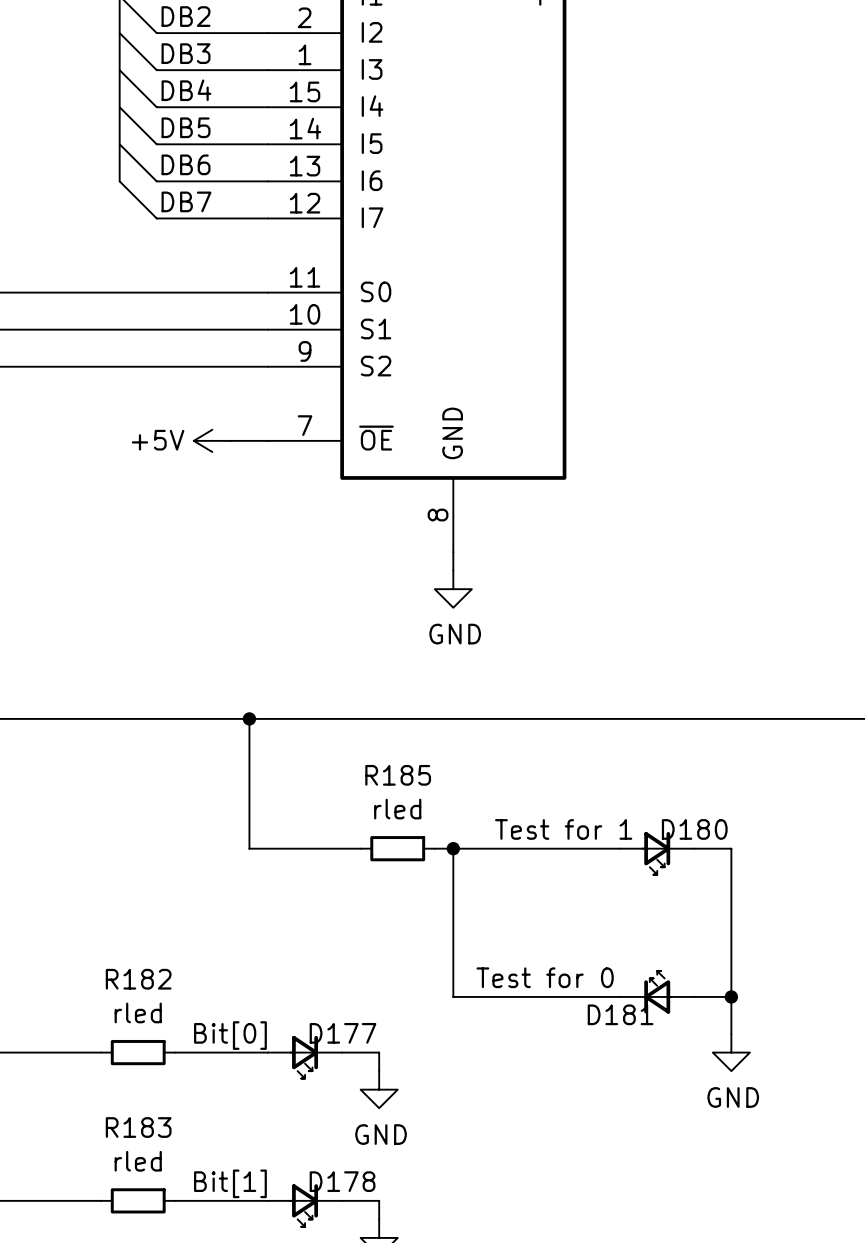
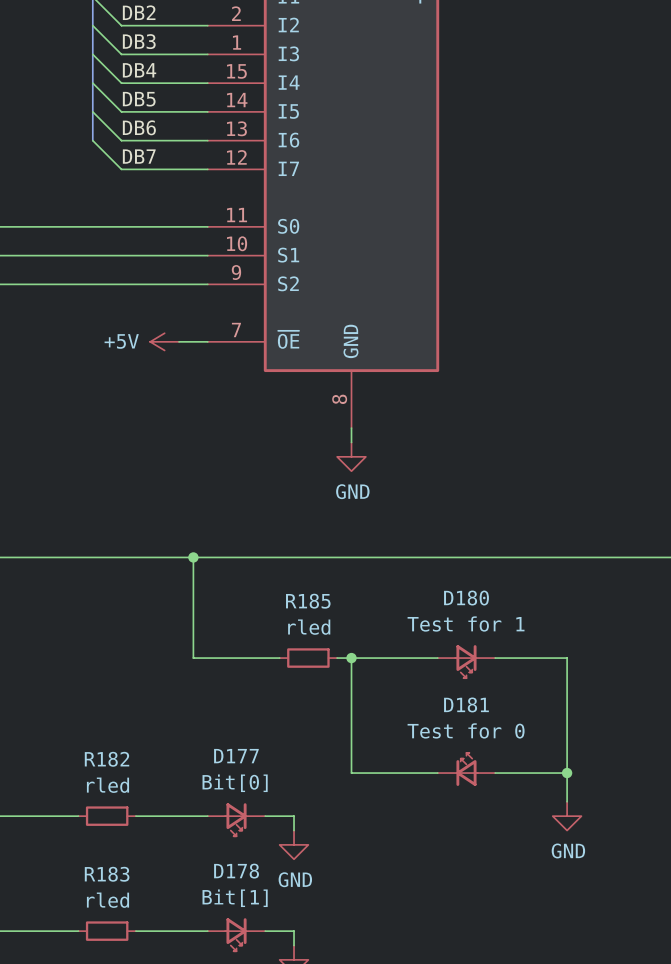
D180 value position: Test for 1 (563, 829) -> Test for 1 (466, 624)
D180 name position: D180 (694, 829) -> D180 (466, 598)
D180 position: (657, 853) -> (466, 661)
D181 value position: Test for 0 (545, 977) -> Test for 0 (466, 730)
D181 position: (657, 992) -> (466, 769)
D181 name position: D181 (620, 1014) -> D181 (466, 704)
D177 name position: D177 (342, 1033) -> D177 (236, 756)
D177 value position: Bit[0] (230, 1035) -> Bit[0] (235, 783)
D178 name position: D178 (342, 1181) -> D178 (236, 871)
D178 value position: Bit[1] (230, 1183) -> Bit[1] (235, 898)

